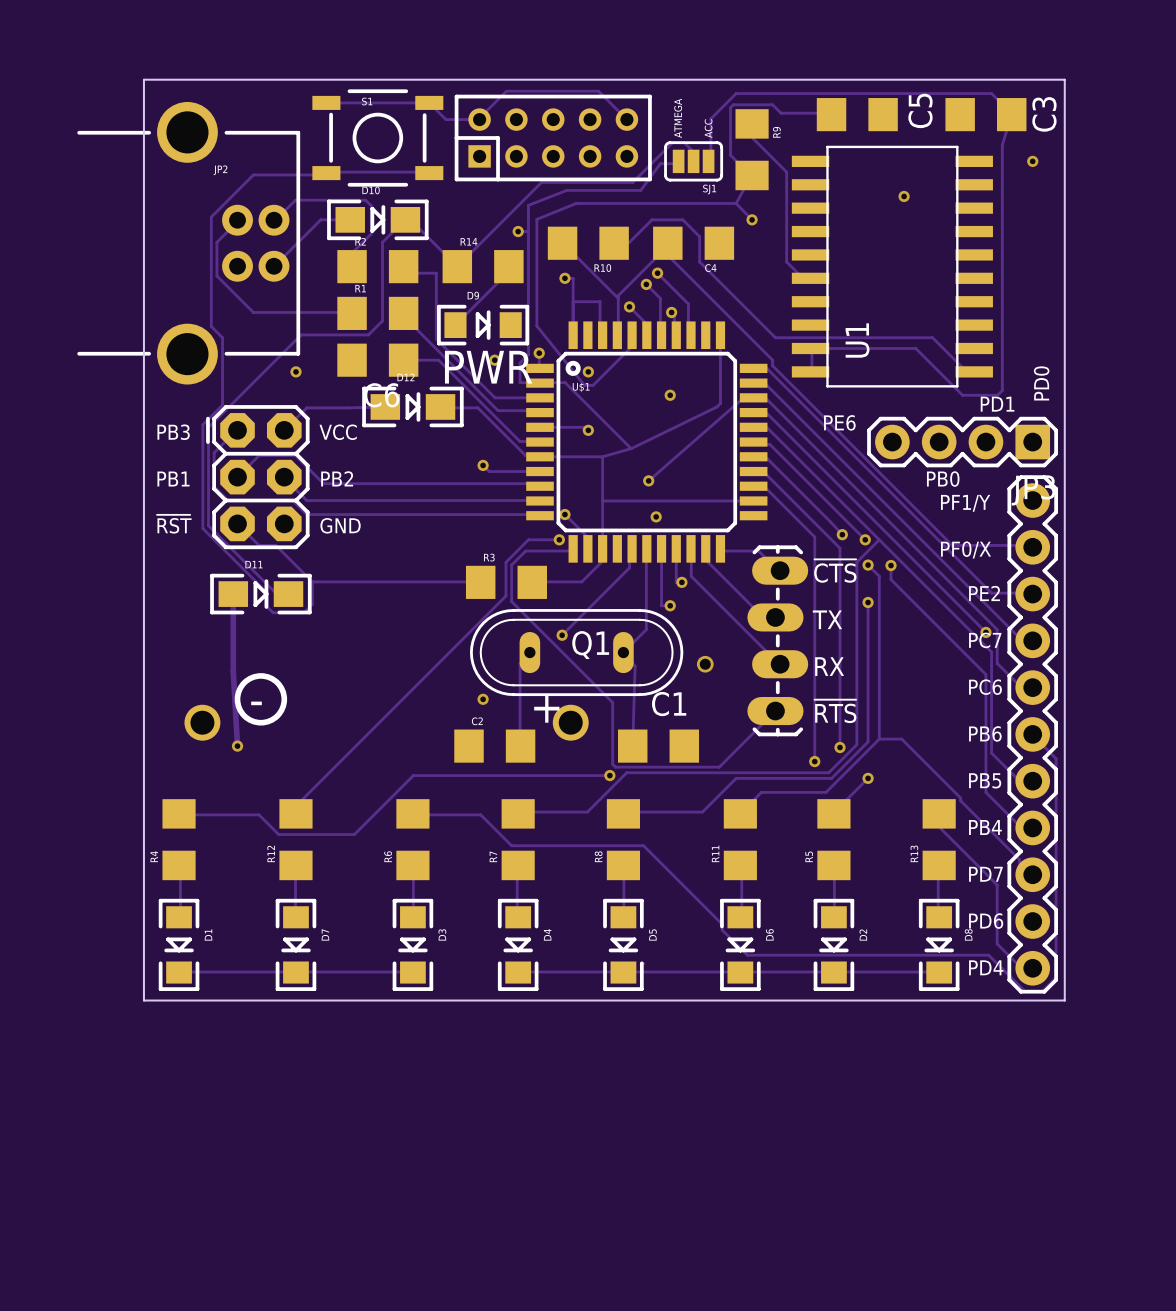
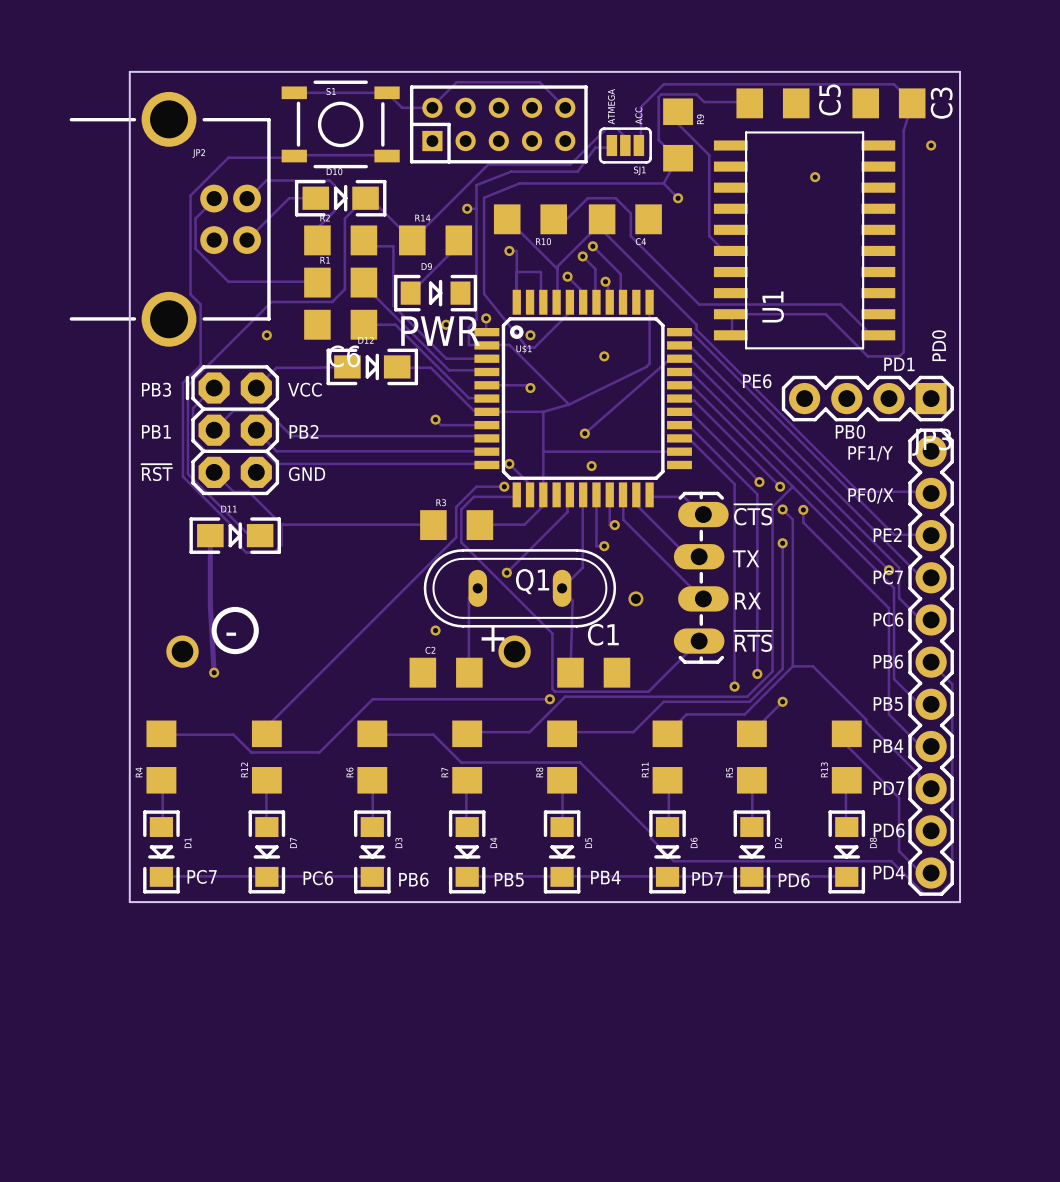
text: none -> PC7 (202, 876)
text: none -> PB4 (605, 877)
text: none -> PC6 (318, 878)
text: none -> PD7 (707, 878)
text: none -> PB6 (413, 879)
text: none -> PB5 (509, 879)
text: none -> PD6 (794, 880)

